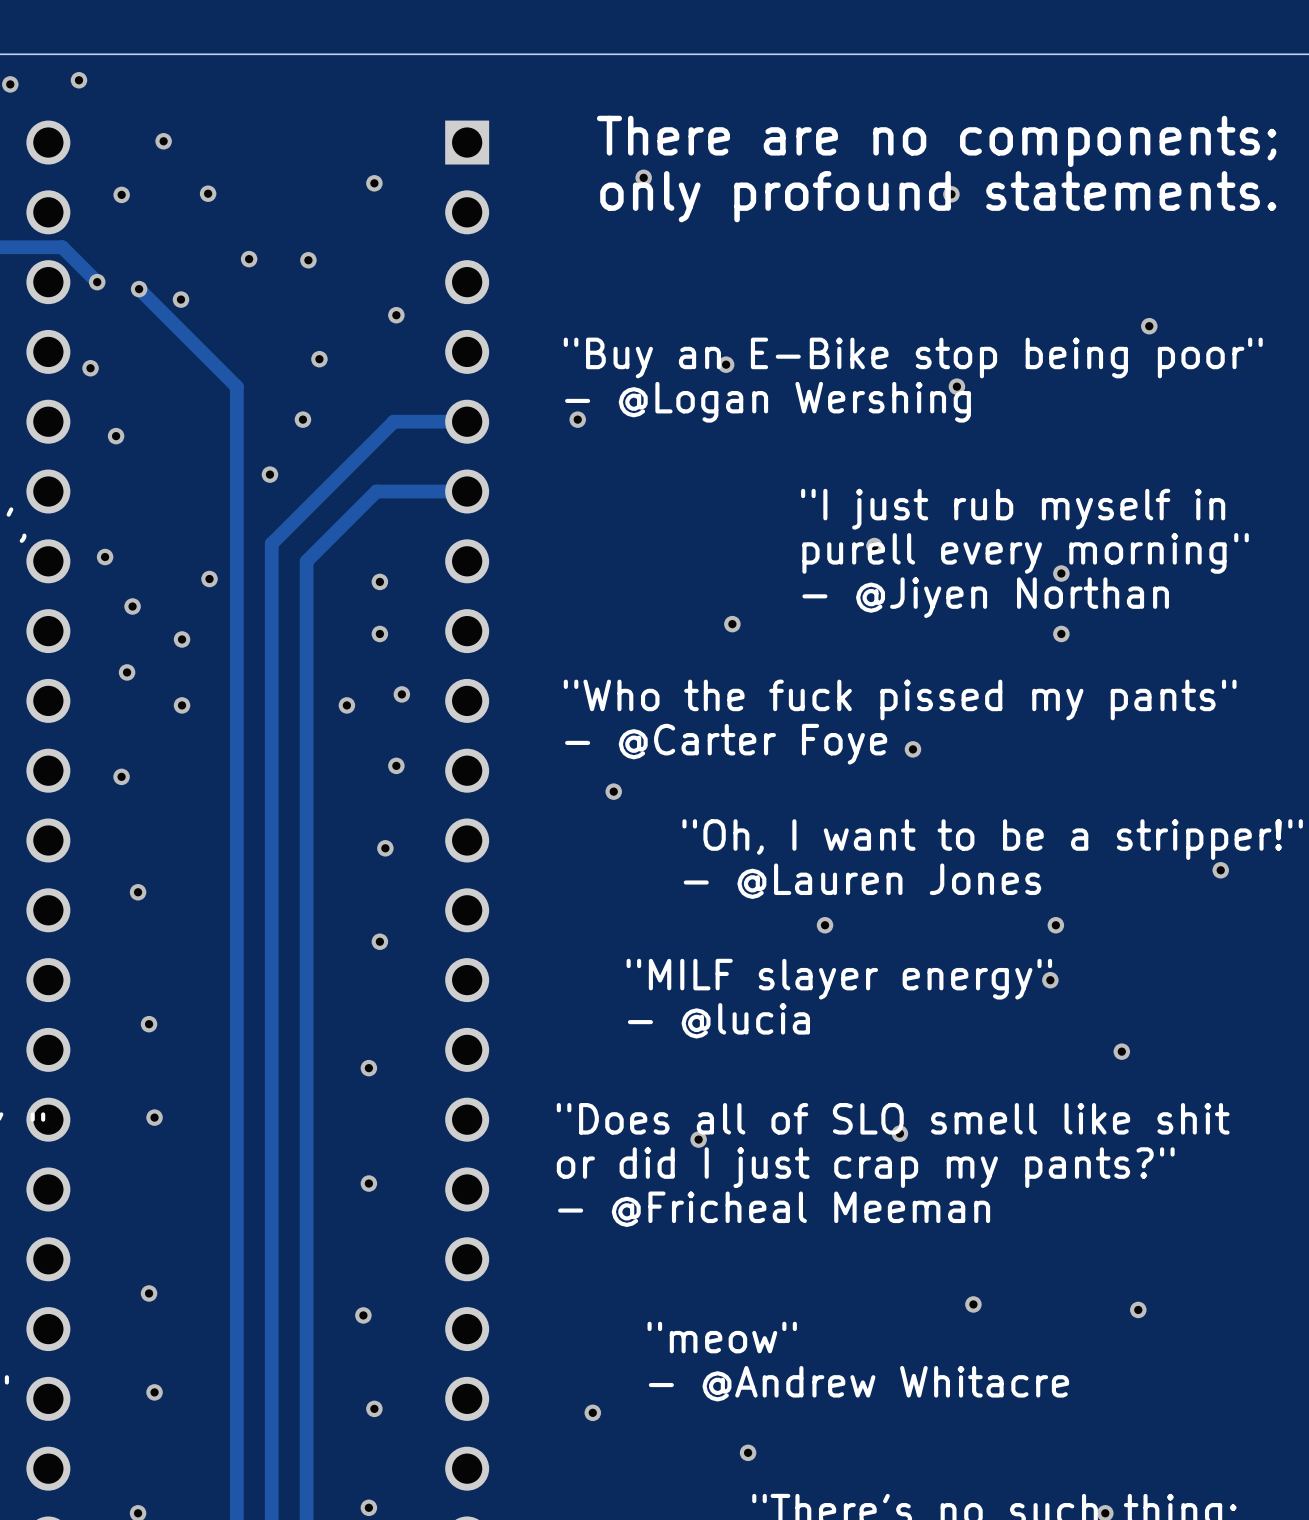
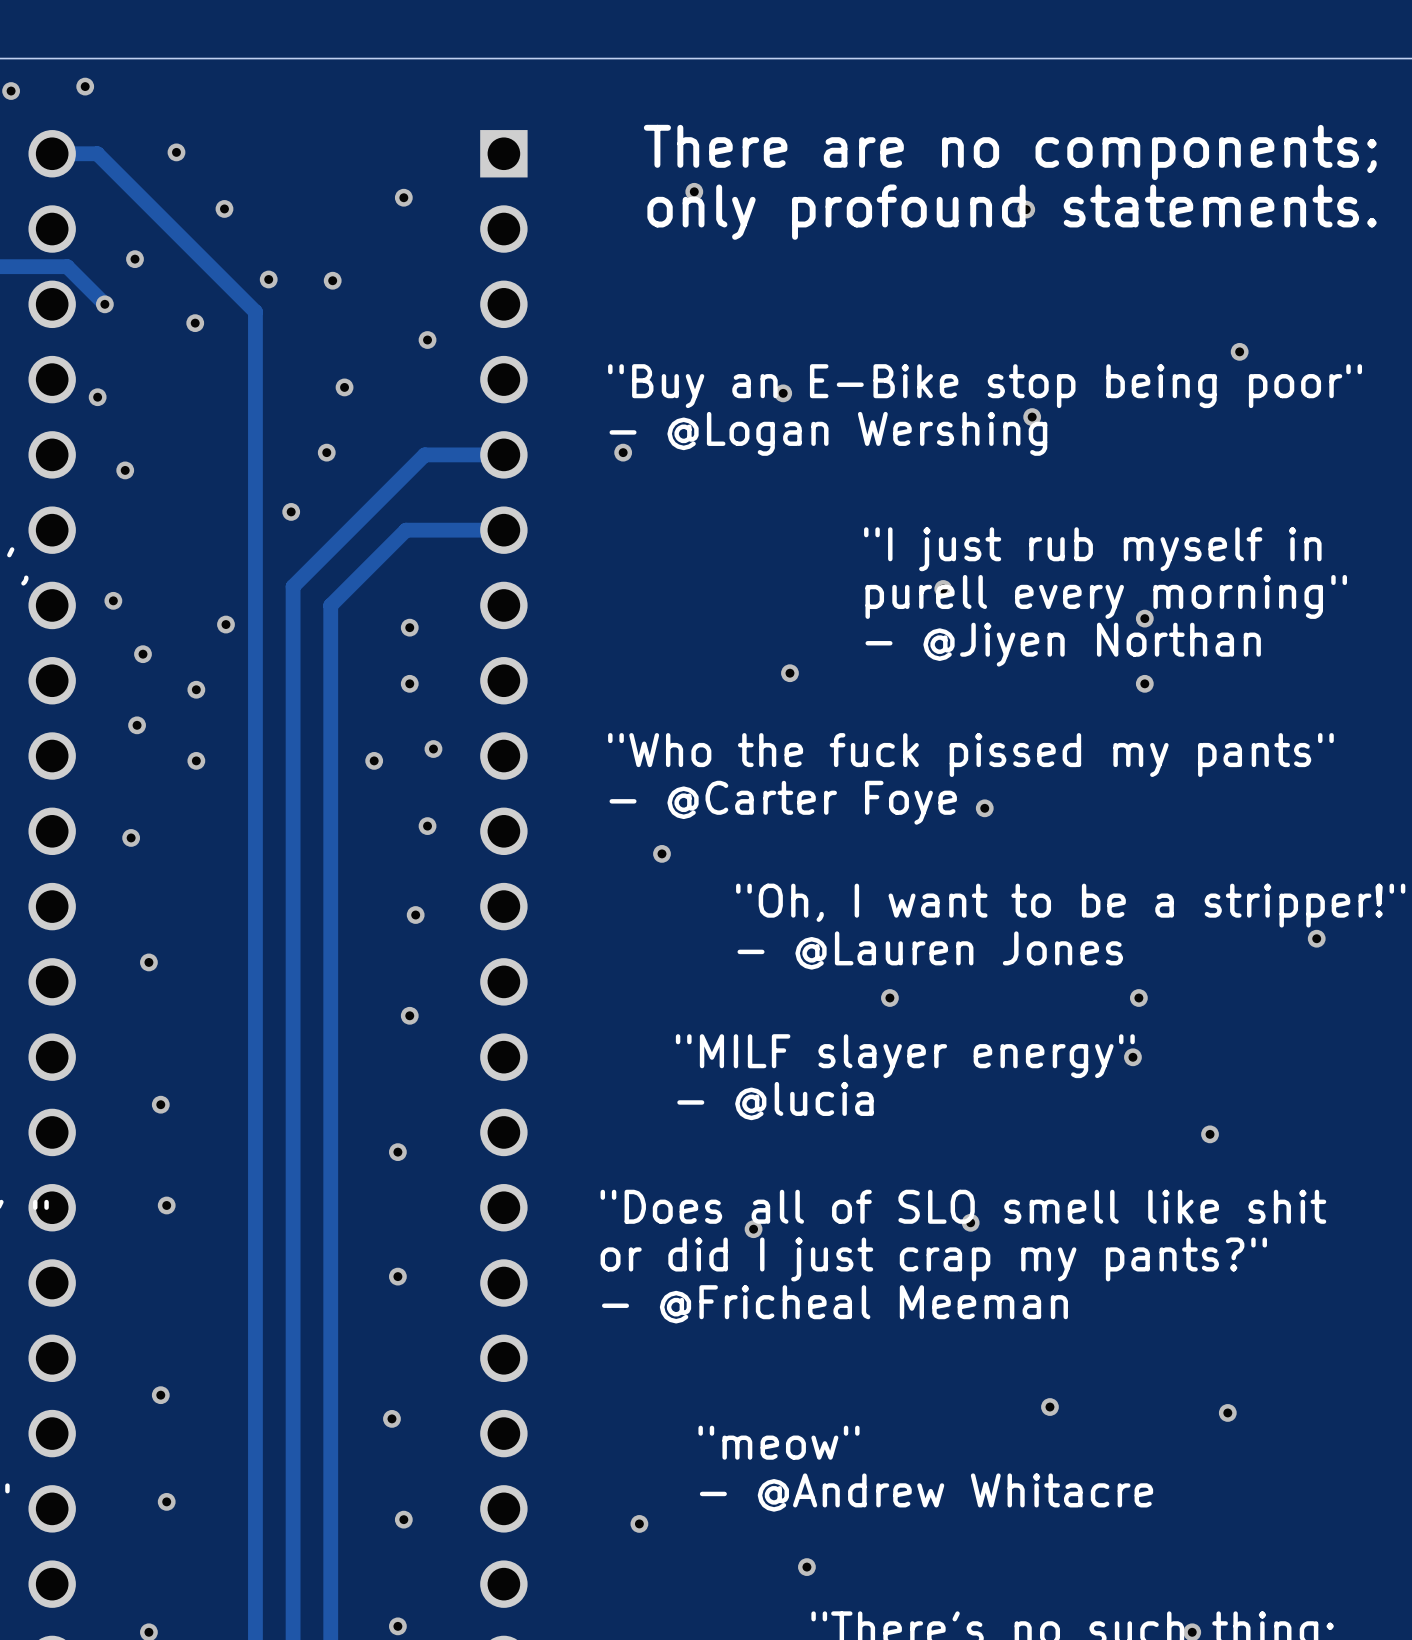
via: (121, 194) -> none
via: none -> (134, 259)
track: (139, 289) (236, 386) -> (52, 153) (97, 153) (255, 311) (255, 417)
via: (139, 289) -> none

